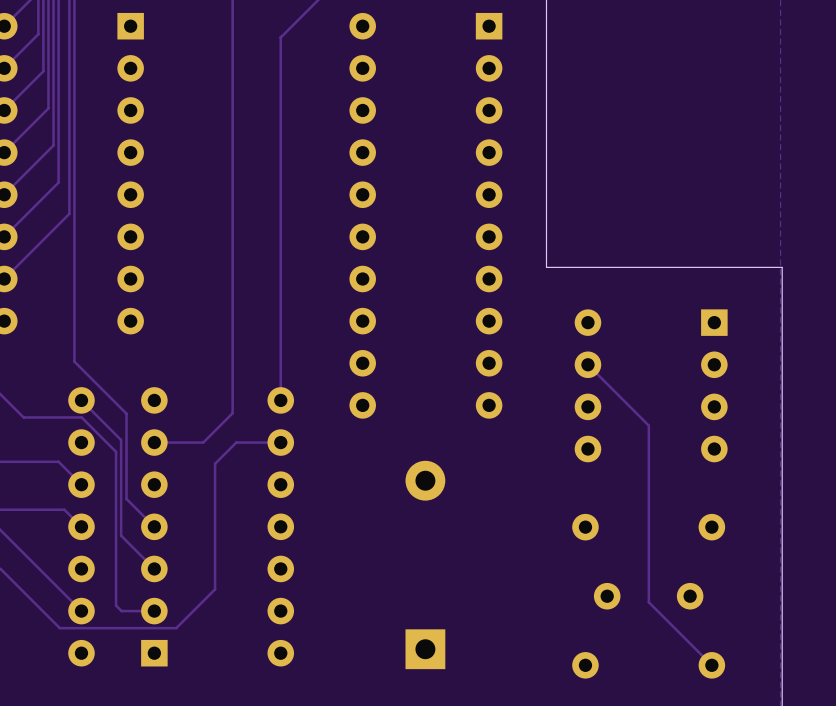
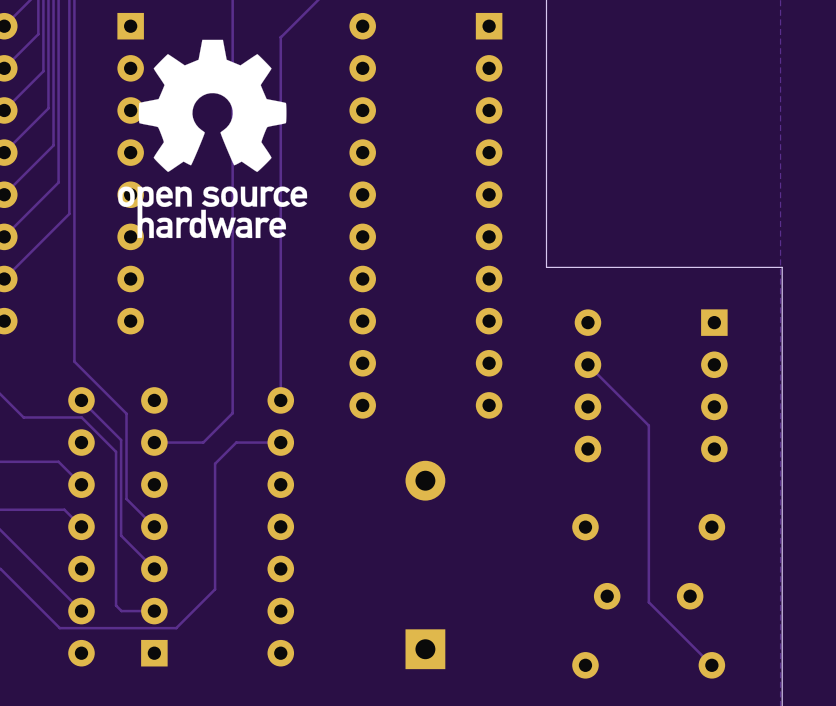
drawing: none -> [118, 39, 308, 239]

